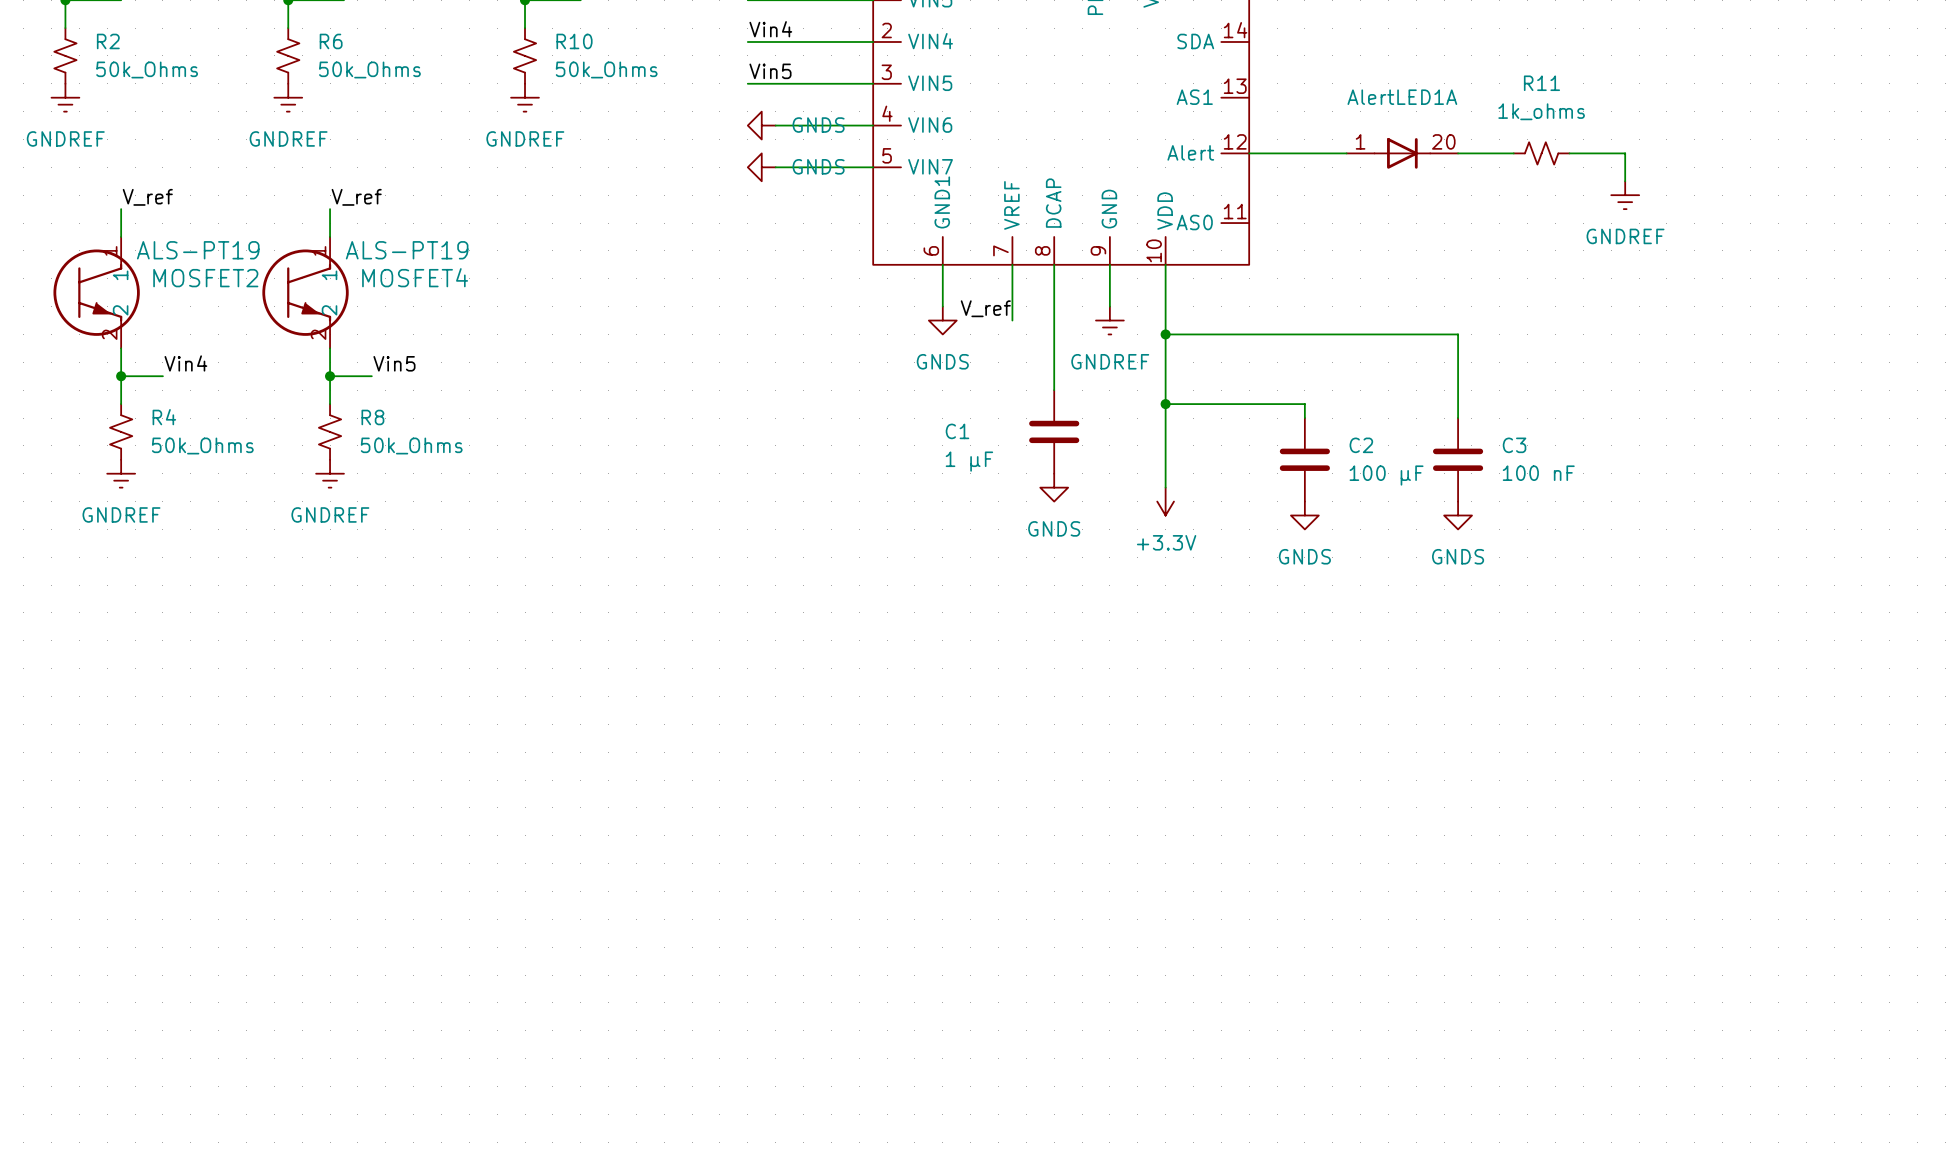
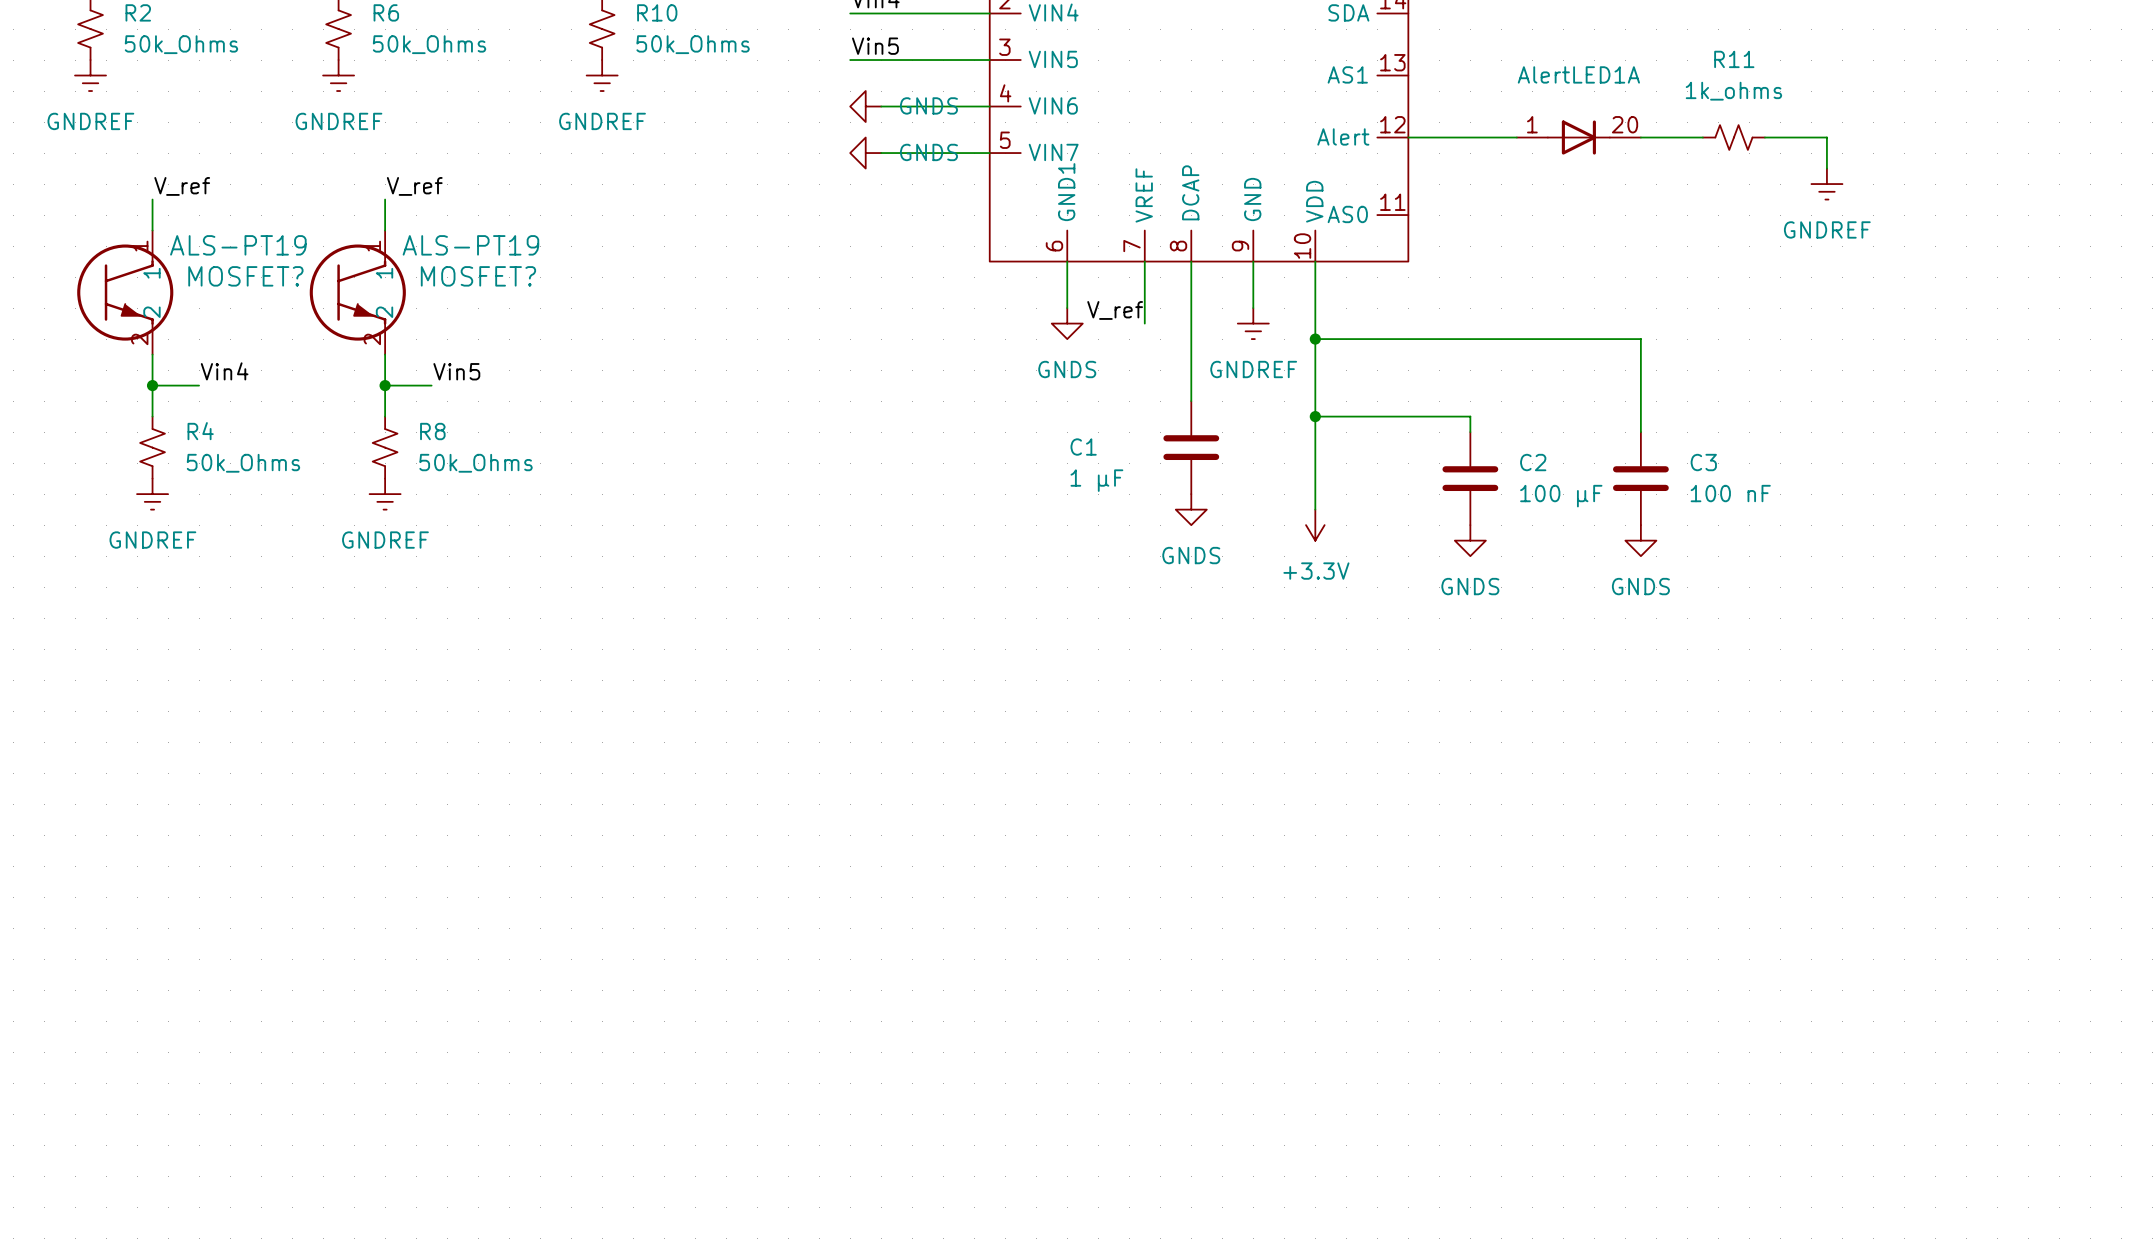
MOSFET4 name: MOSFET4 (415, 277) -> MOSFET? (478, 276)
MOSFET2 name: MOSFET2 (205, 278) -> MOSFET? (245, 276)

